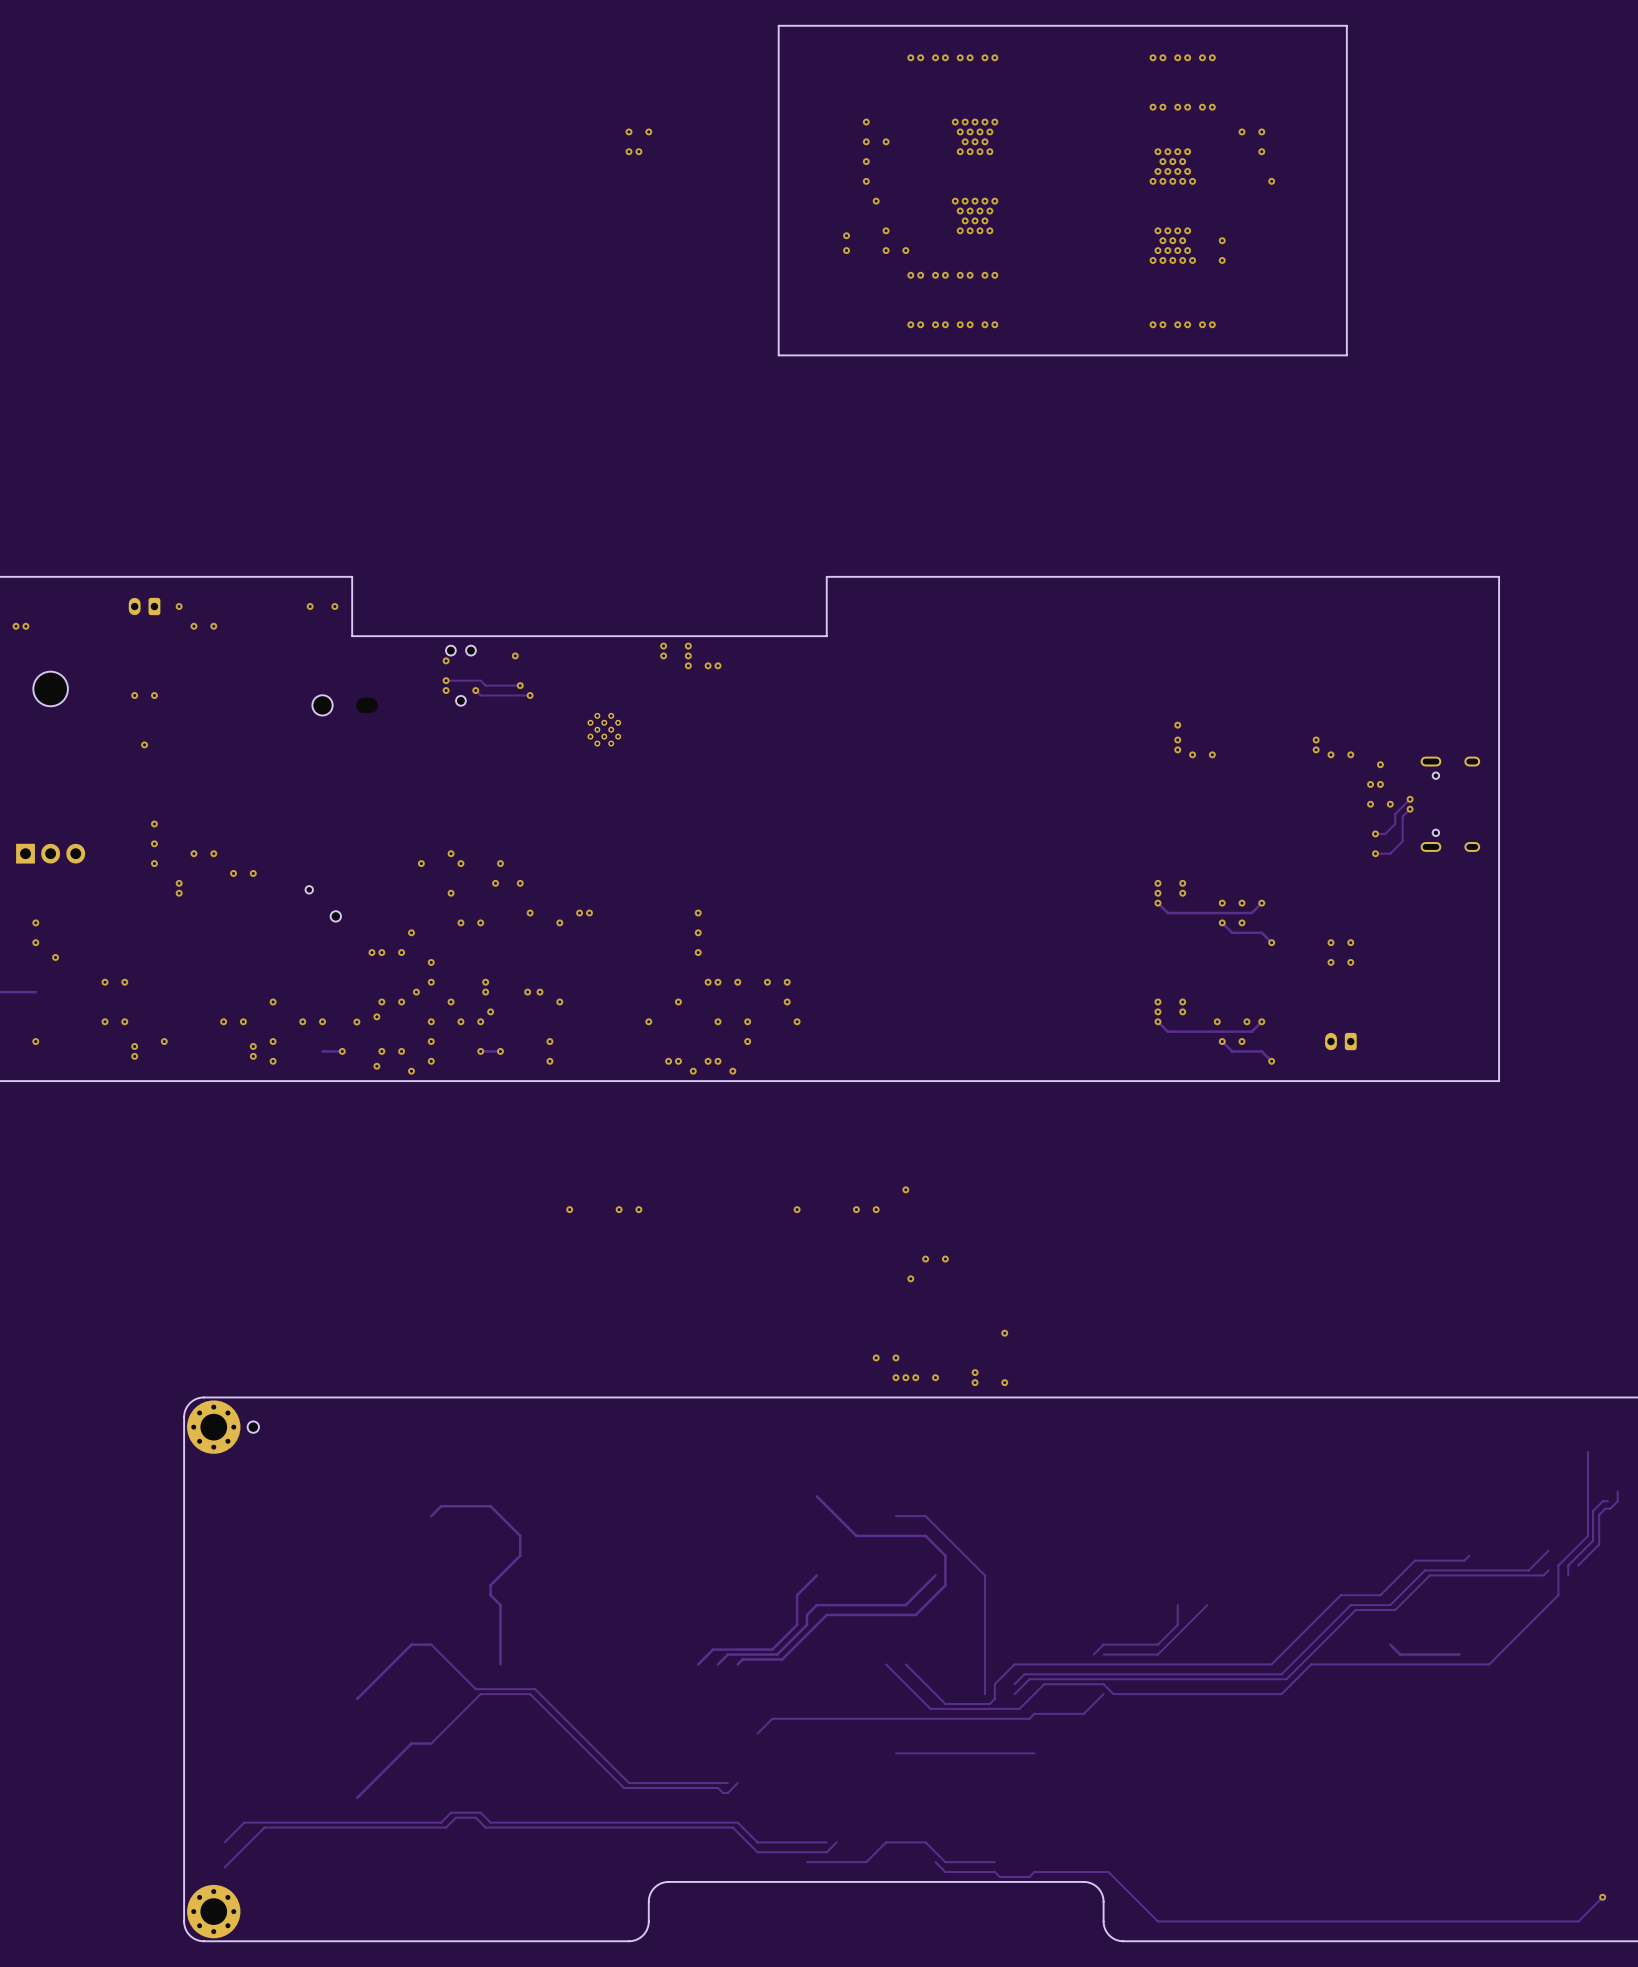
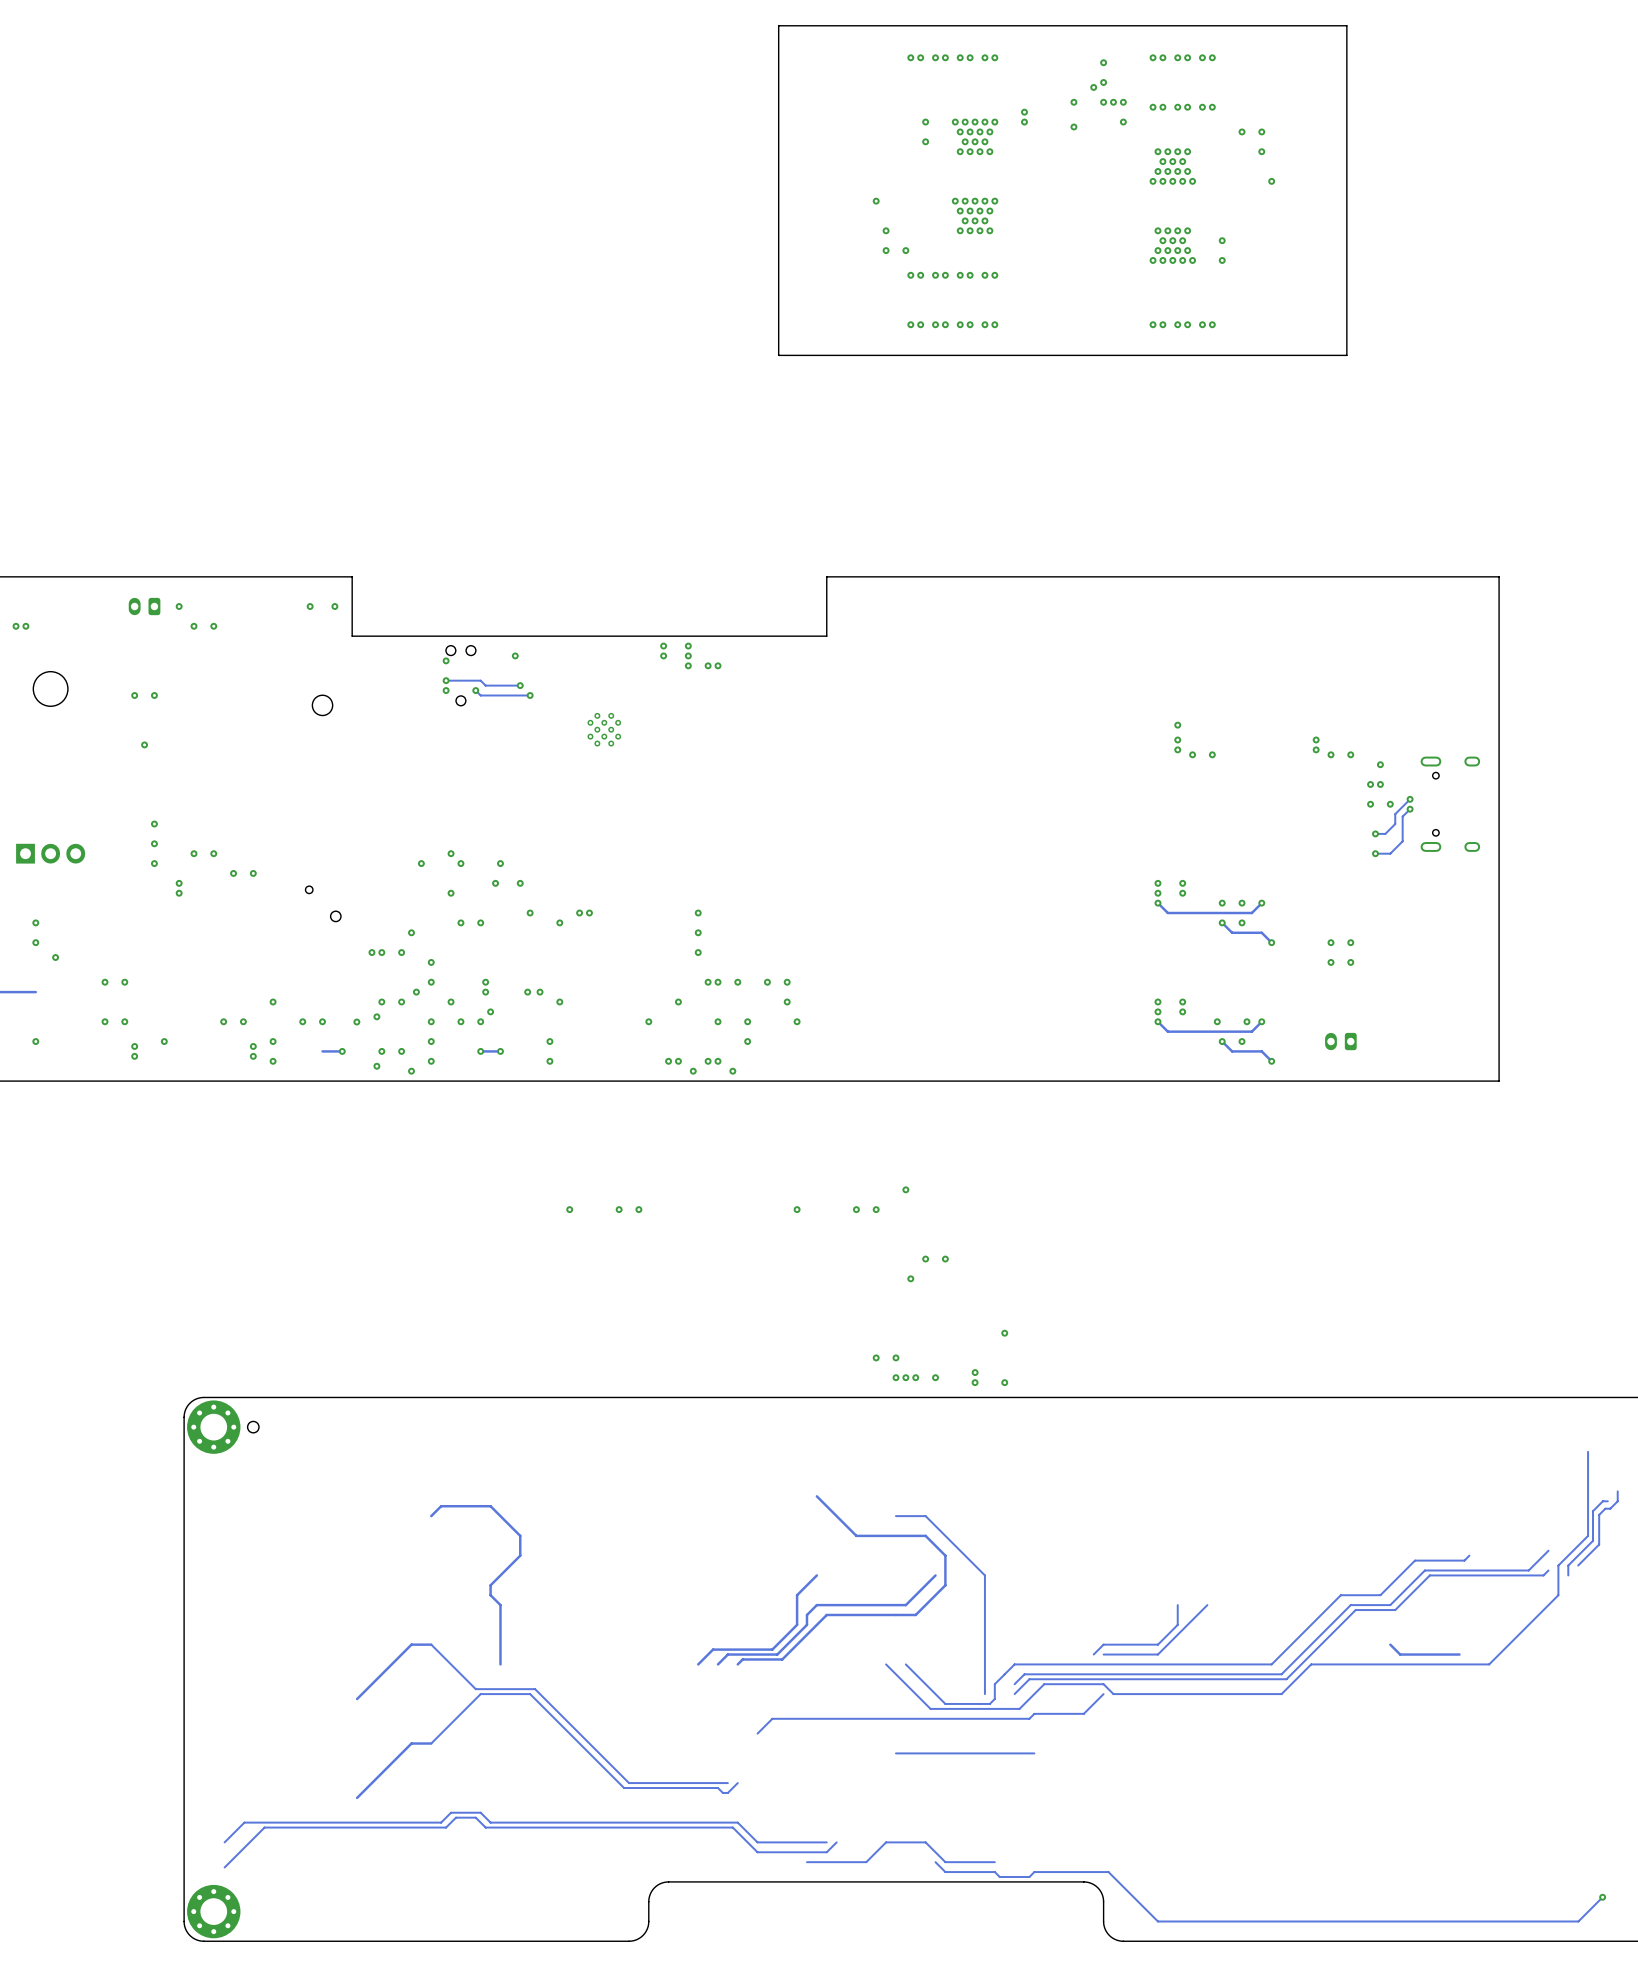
via: none -> (1103, 62)
via: none -> (1103, 82)
via: none -> (1093, 87)
via: none -> (1073, 102)
via: none -> (1103, 102)
via: none -> (1113, 102)
via: none -> (1123, 102)
via: none -> (1024, 112)
via: (866, 122) -> none
via: none -> (925, 122)
via: none -> (1024, 122)
via: none -> (1123, 122)
via: none -> (1073, 126)
via: (629, 131) -> none
via: (648, 131) -> none
via: (866, 141) -> none
via: (886, 141) -> none
via: none -> (925, 141)
via: (629, 151) -> none
via: (638, 151) -> none
via: (866, 161) -> none
via: (866, 181) -> none
via: (846, 235) -> none
via: (846, 250) -> none

